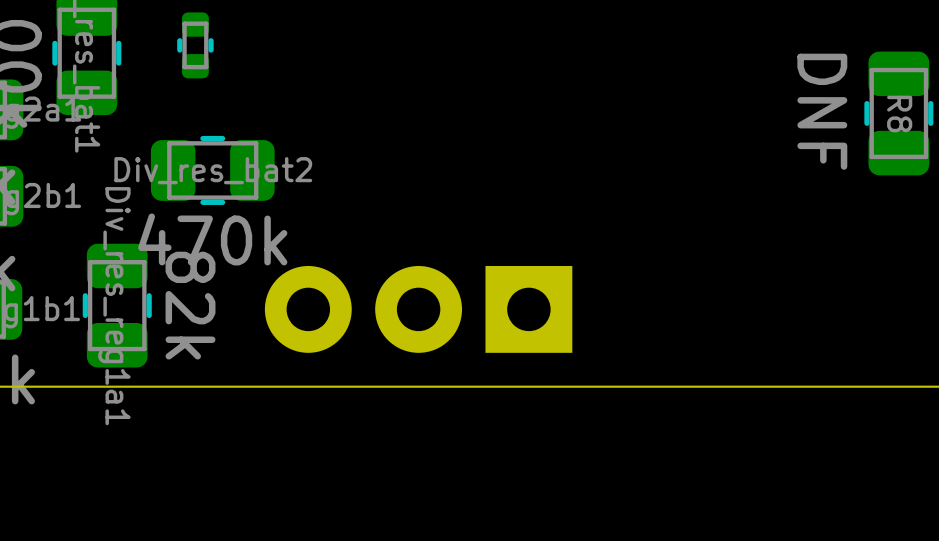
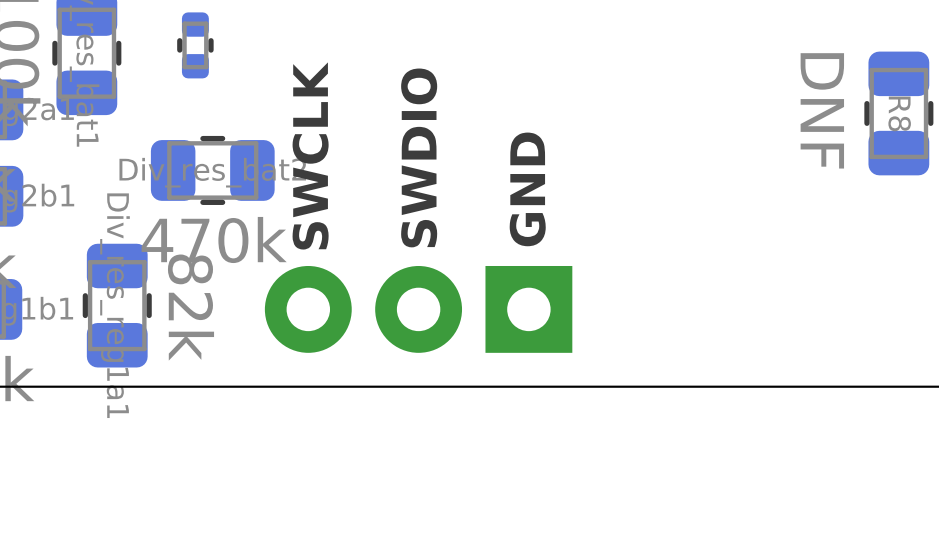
text: none -> SWCLK (310, 155)
text: none -> SWDIO (419, 157)
text: none -> GND (527, 189)

